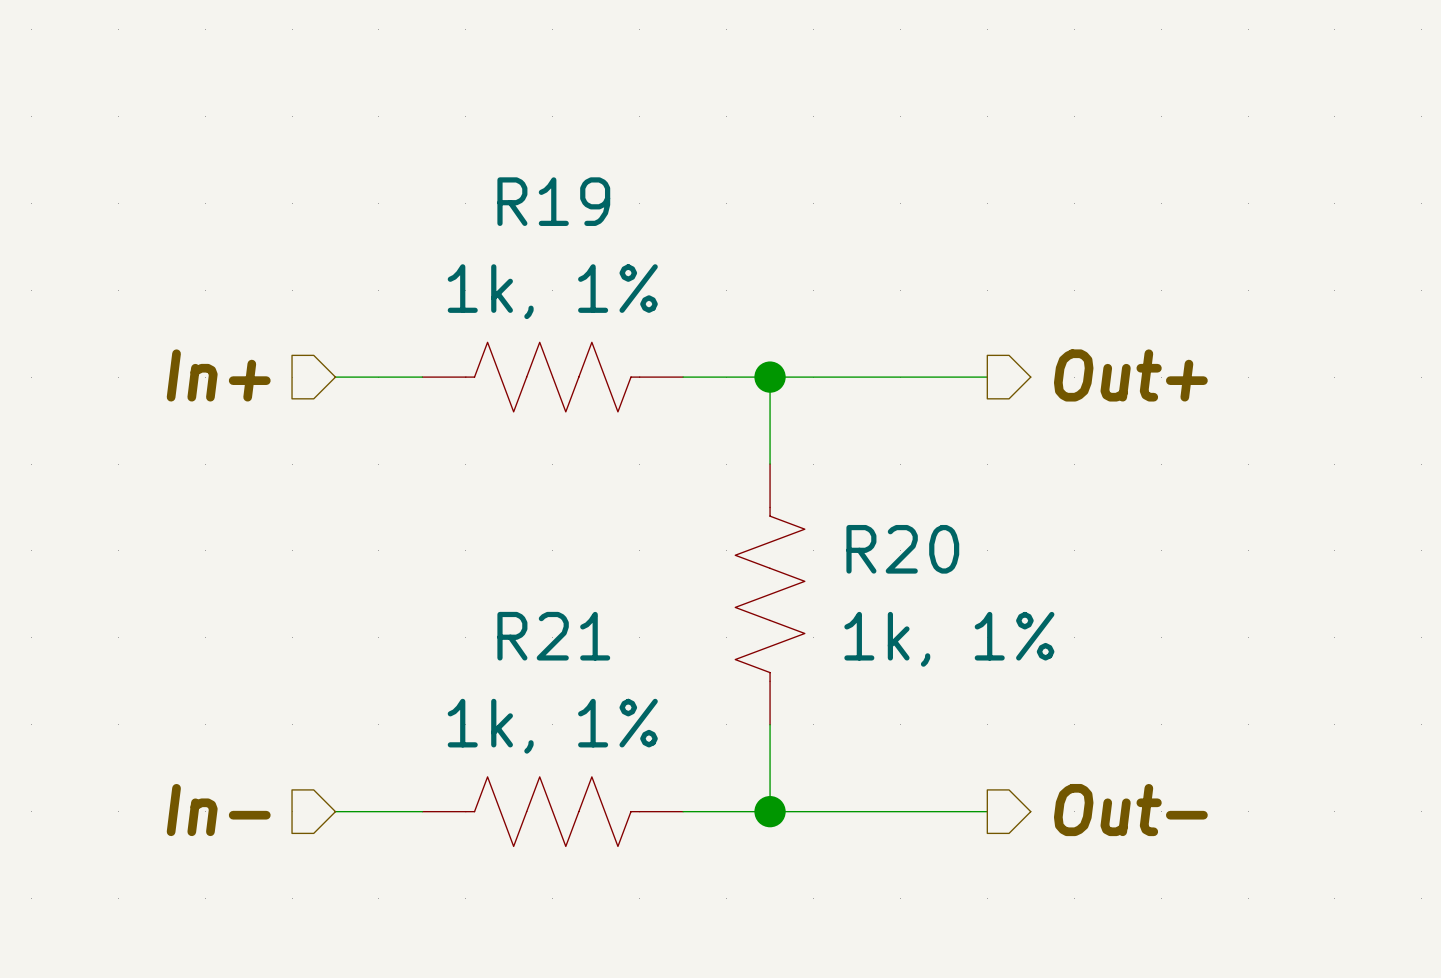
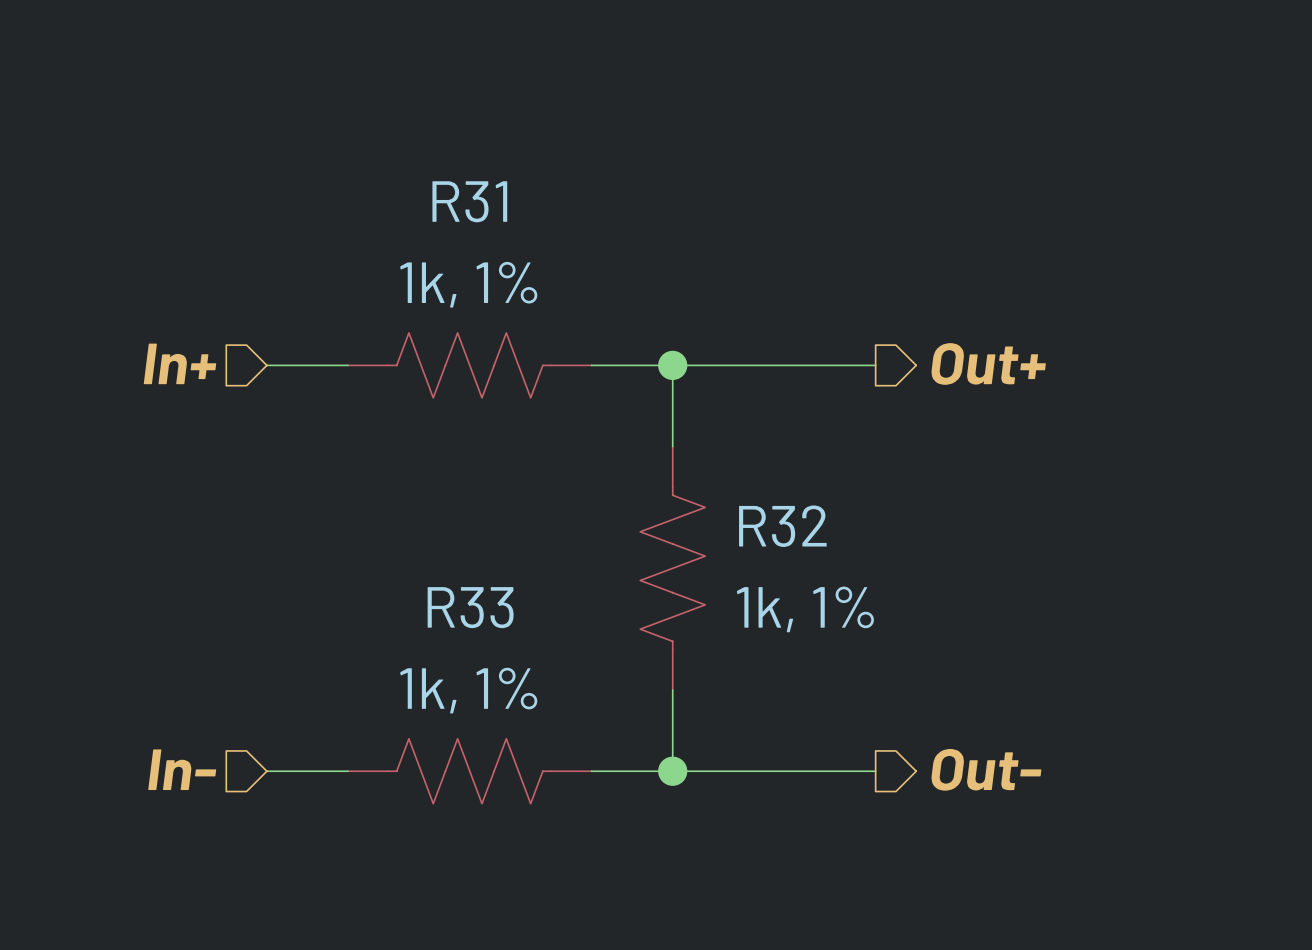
R19 name: R19 (553, 201) -> R31 (469, 201)
R20 name: R20 (902, 549) -> R32 (782, 526)
R21 name: R21 (553, 636) -> R33 (470, 607)

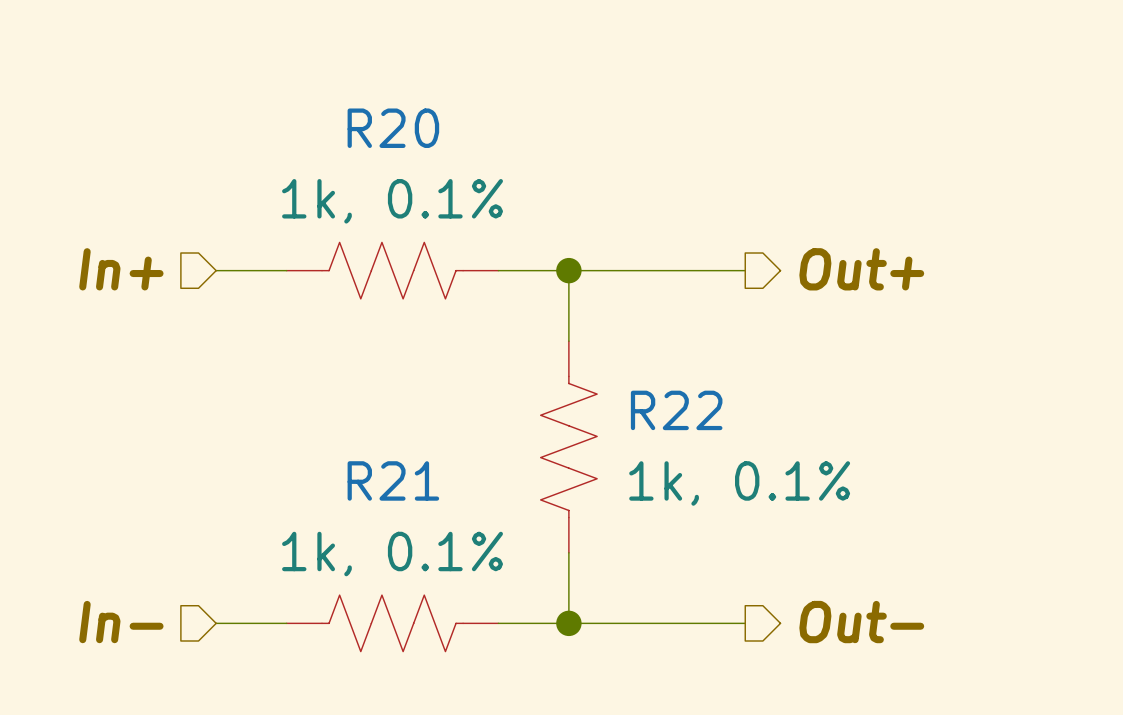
R31 name: R31 (469, 201) -> R20 (393, 128)
R31 value: 1k, 1% (468, 284) -> 1k, 0.1% (392, 201)
R32 name: R32 (782, 526) -> R22 (676, 410)
R33 name: R33 (470, 607) -> R21 (393, 480)
R32 value: 1k, 1% (805, 609) -> 1k, 0.1% (739, 483)
R33 value: 1k, 1% (468, 690) -> 1k, 0.1% (392, 554)

